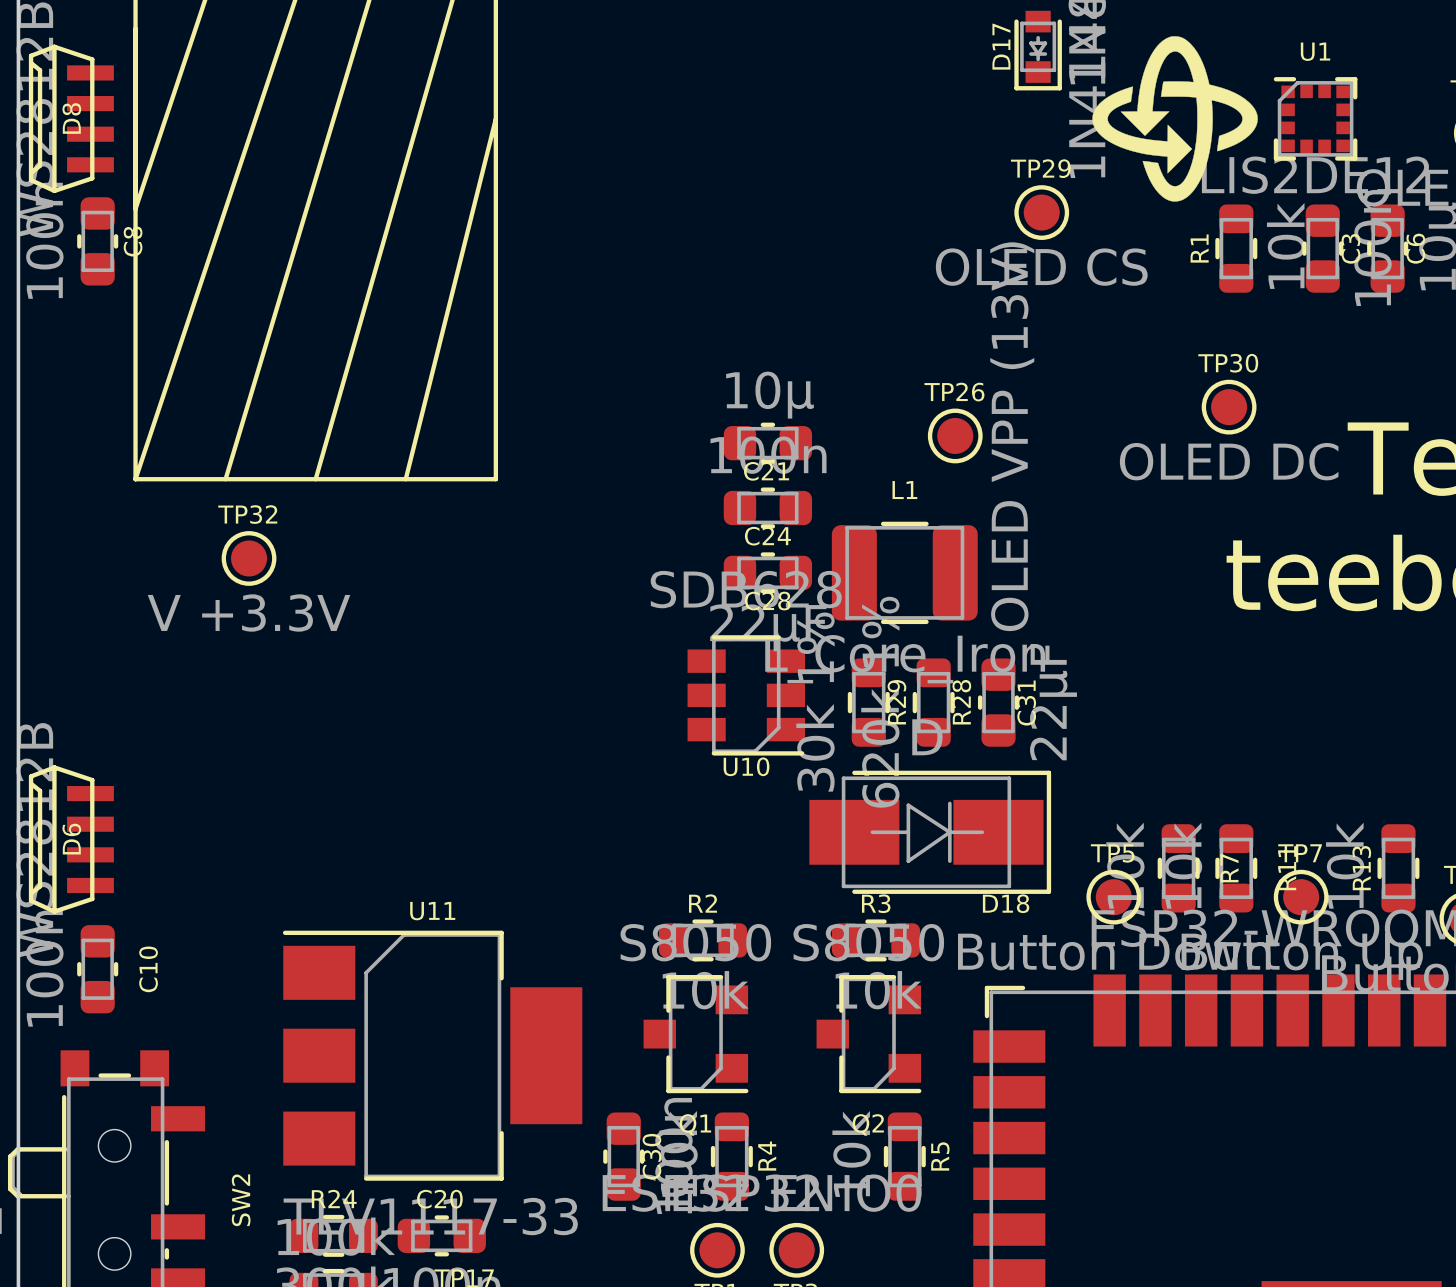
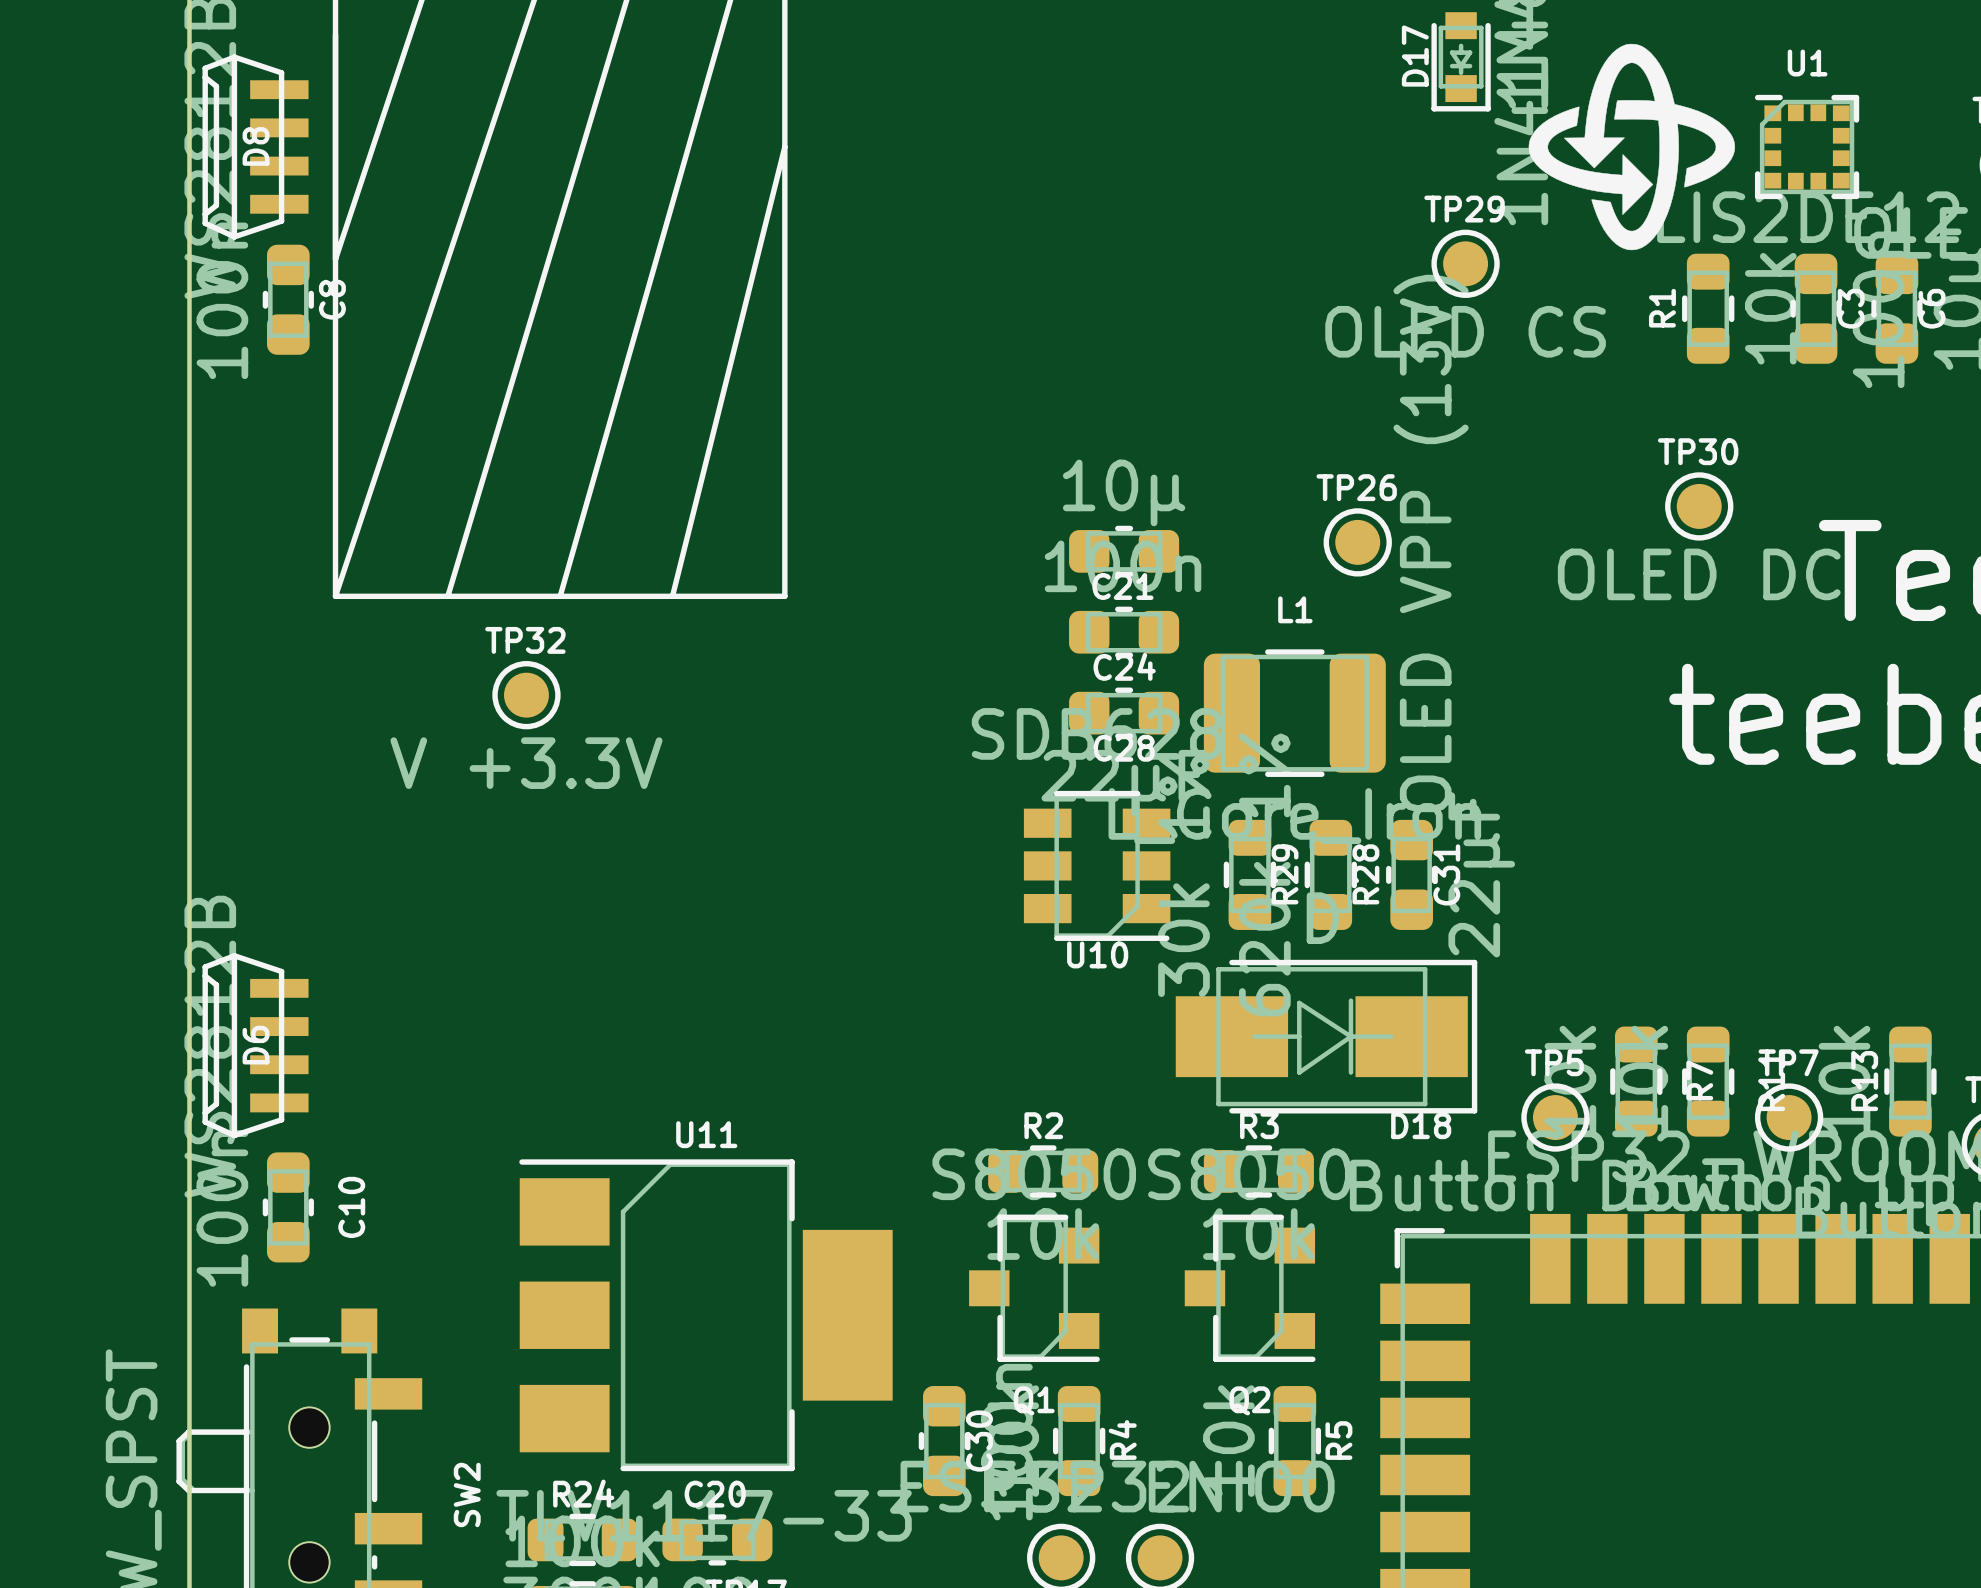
TP32 position: (249, 558) -> (526, 695)

